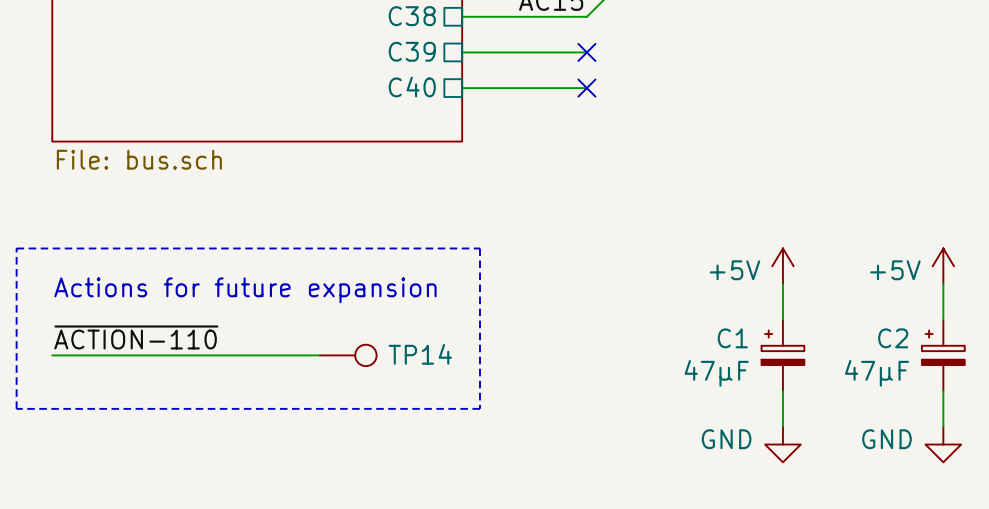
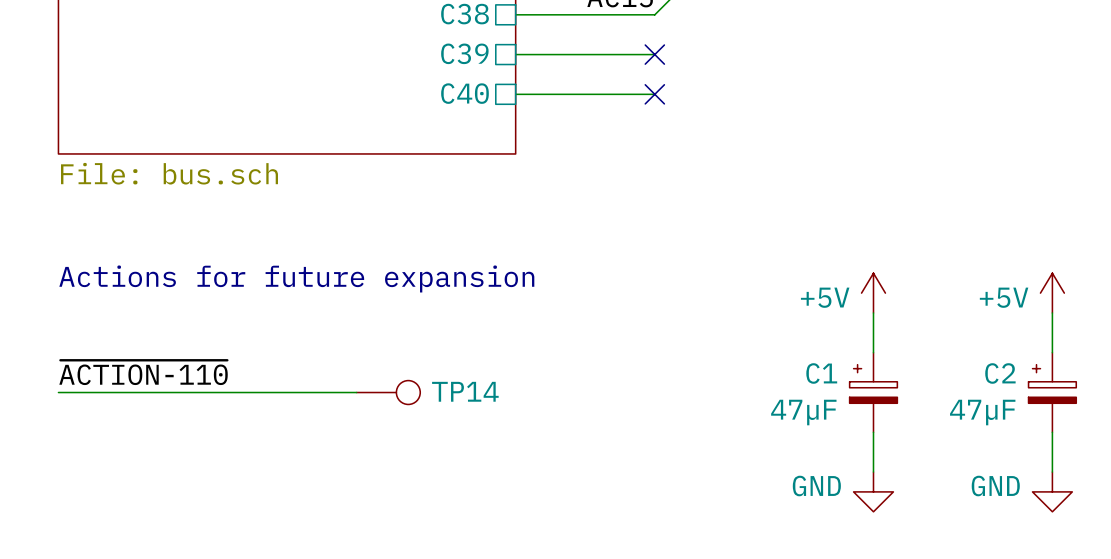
line: (16, 248) (479, 248) (479, 408) (16, 408) (16, 248) -> none
text position: Actions for future expansion (245, 290) -> Actions for future expansion (296, 278)

